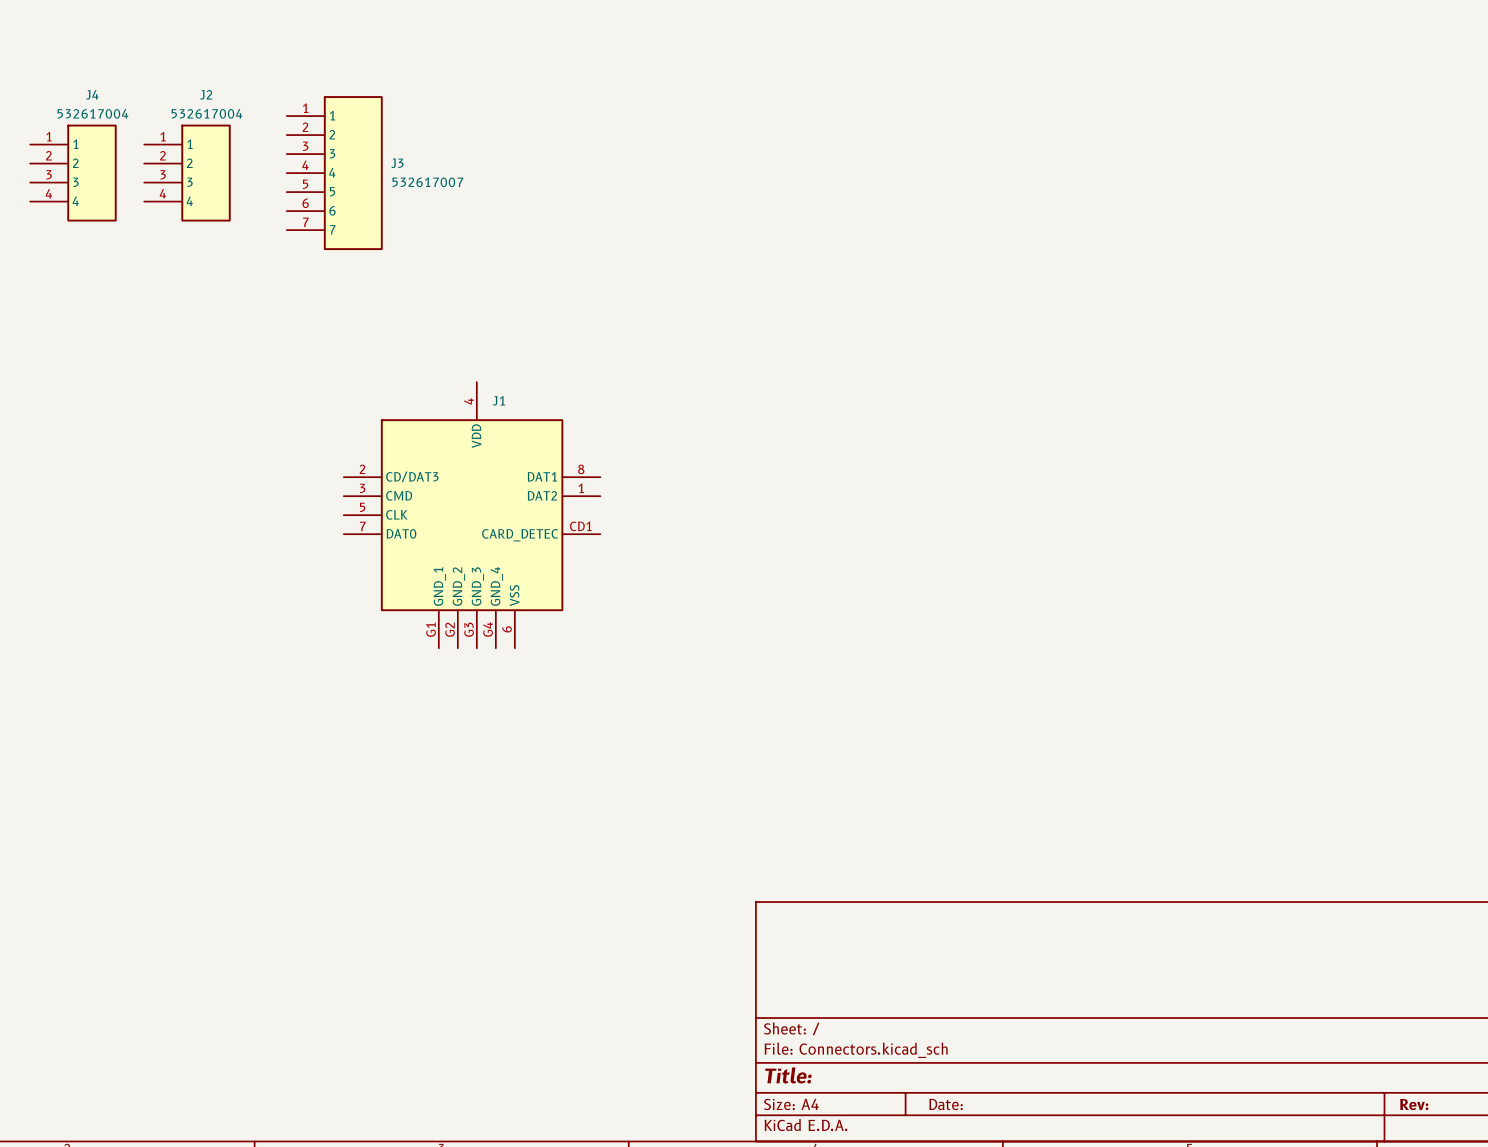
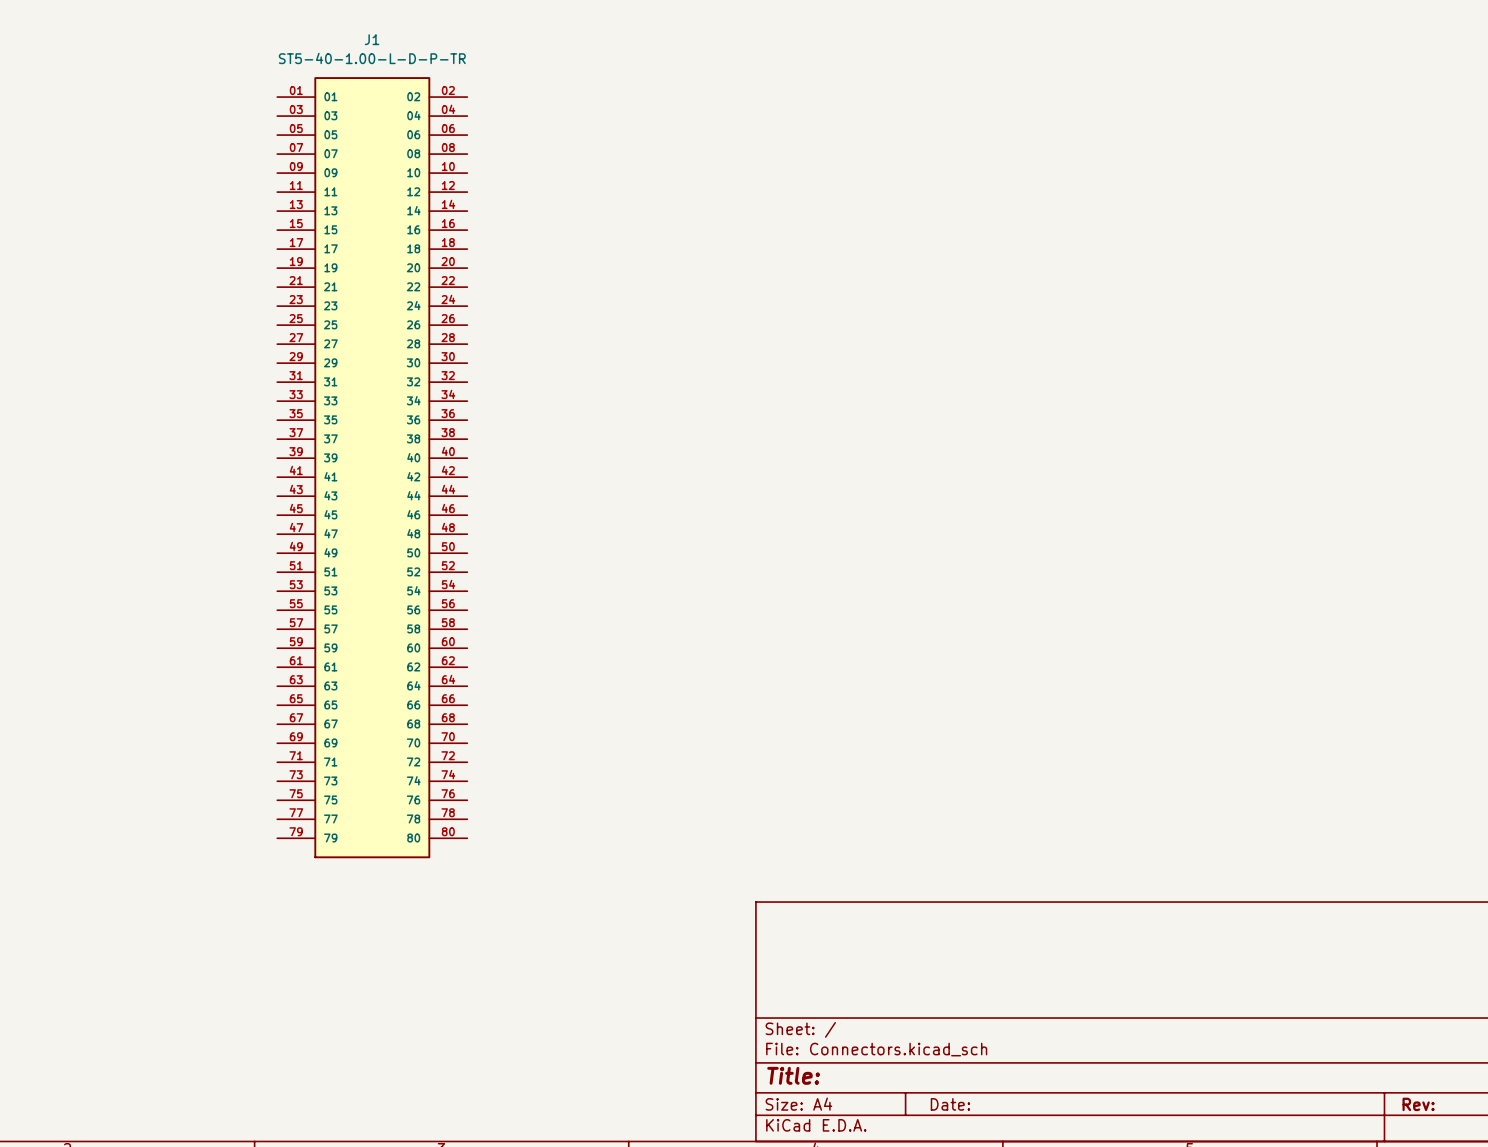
J1 value: none -> ST5-40-1.00-L-D-P-TR (372, 58)
J4: 532617004 (73, 173) -> none
J2: 532617004 (187, 173) -> none
J3: 532617007 (334, 173) -> none
J1 symbol: [343, 382, 601, 649] -> [277, 77, 468, 859]
J1 name position: J1 (498, 400) -> J1 (372, 39)

